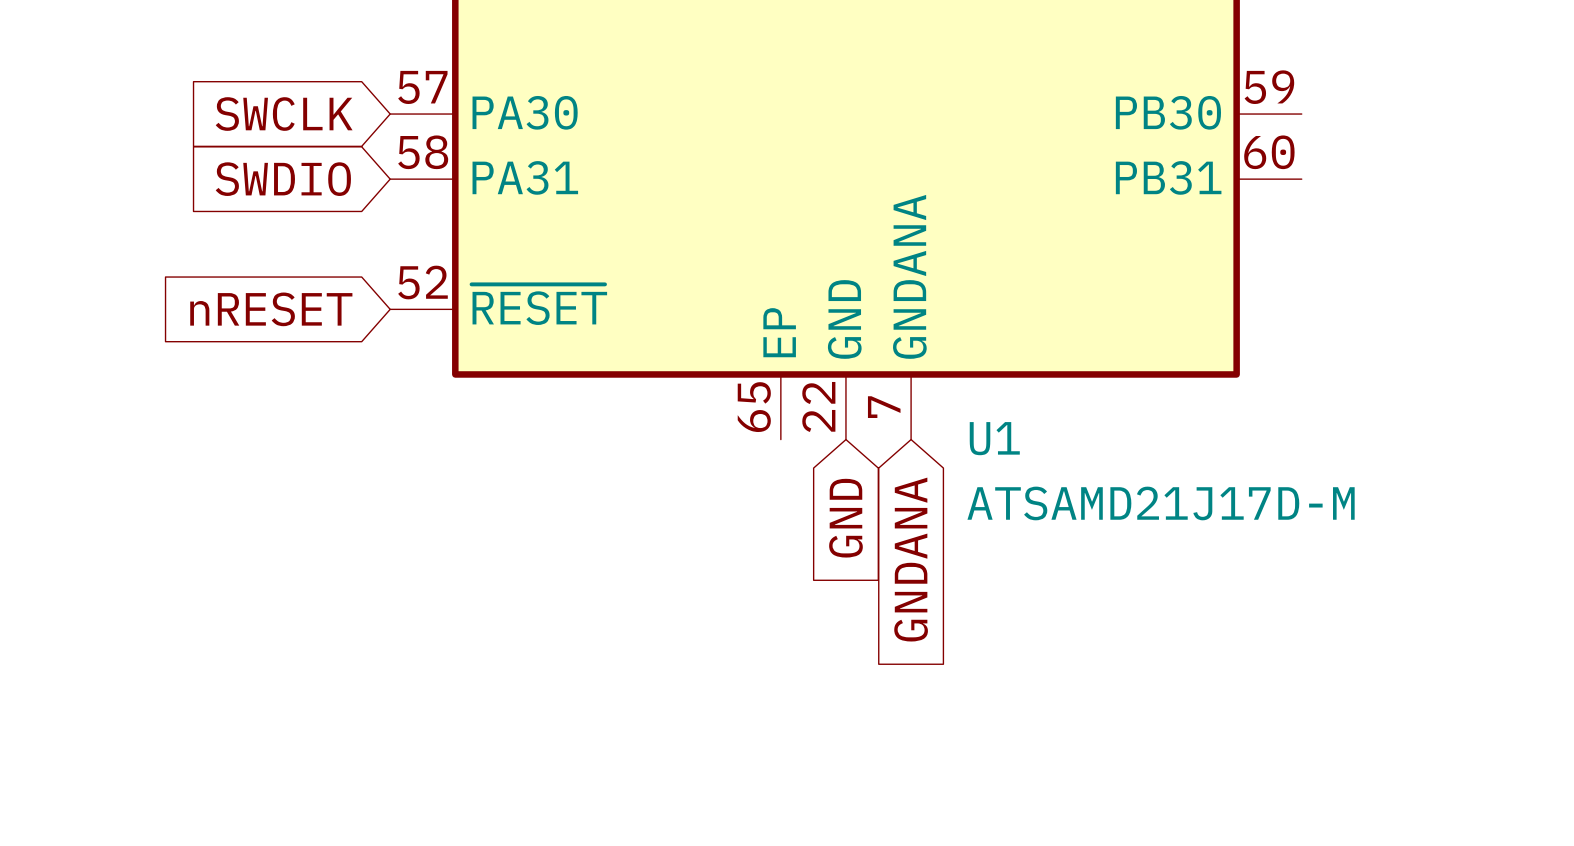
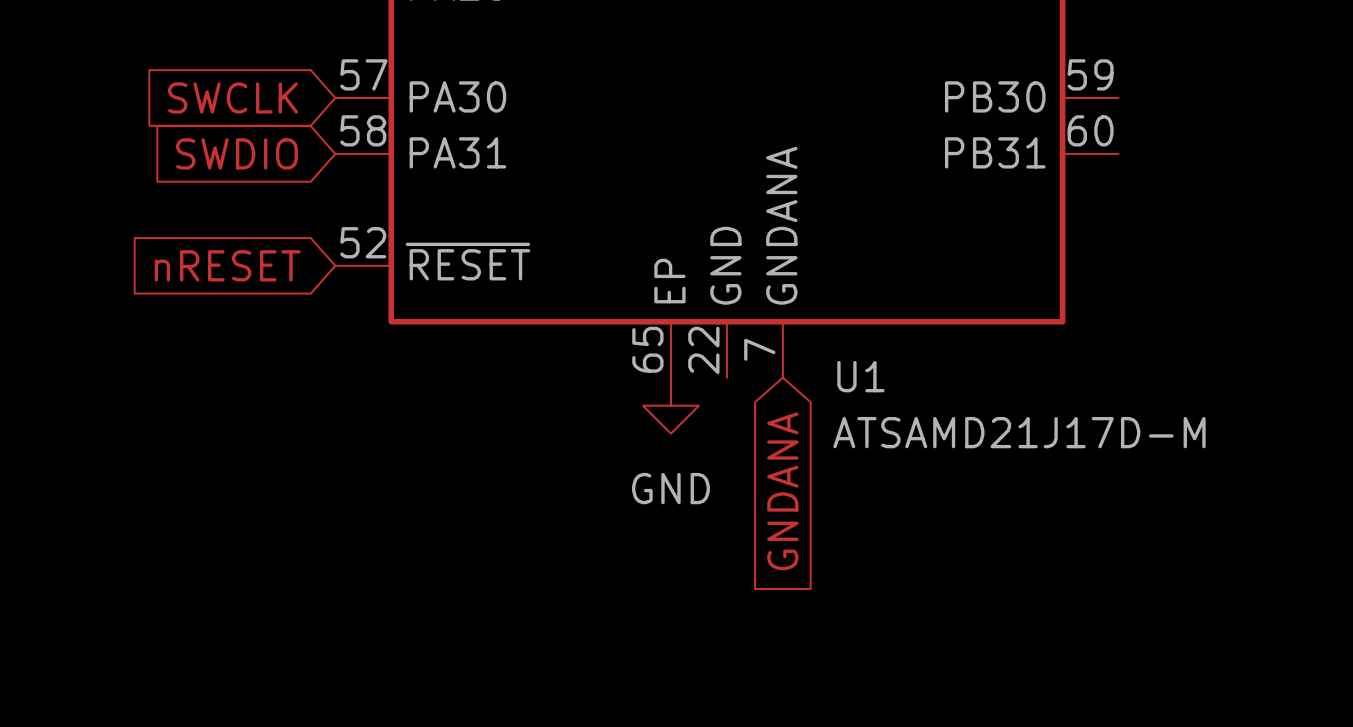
power symbol: none -> GND (670, 405)
global label: GND (845, 518) -> none

